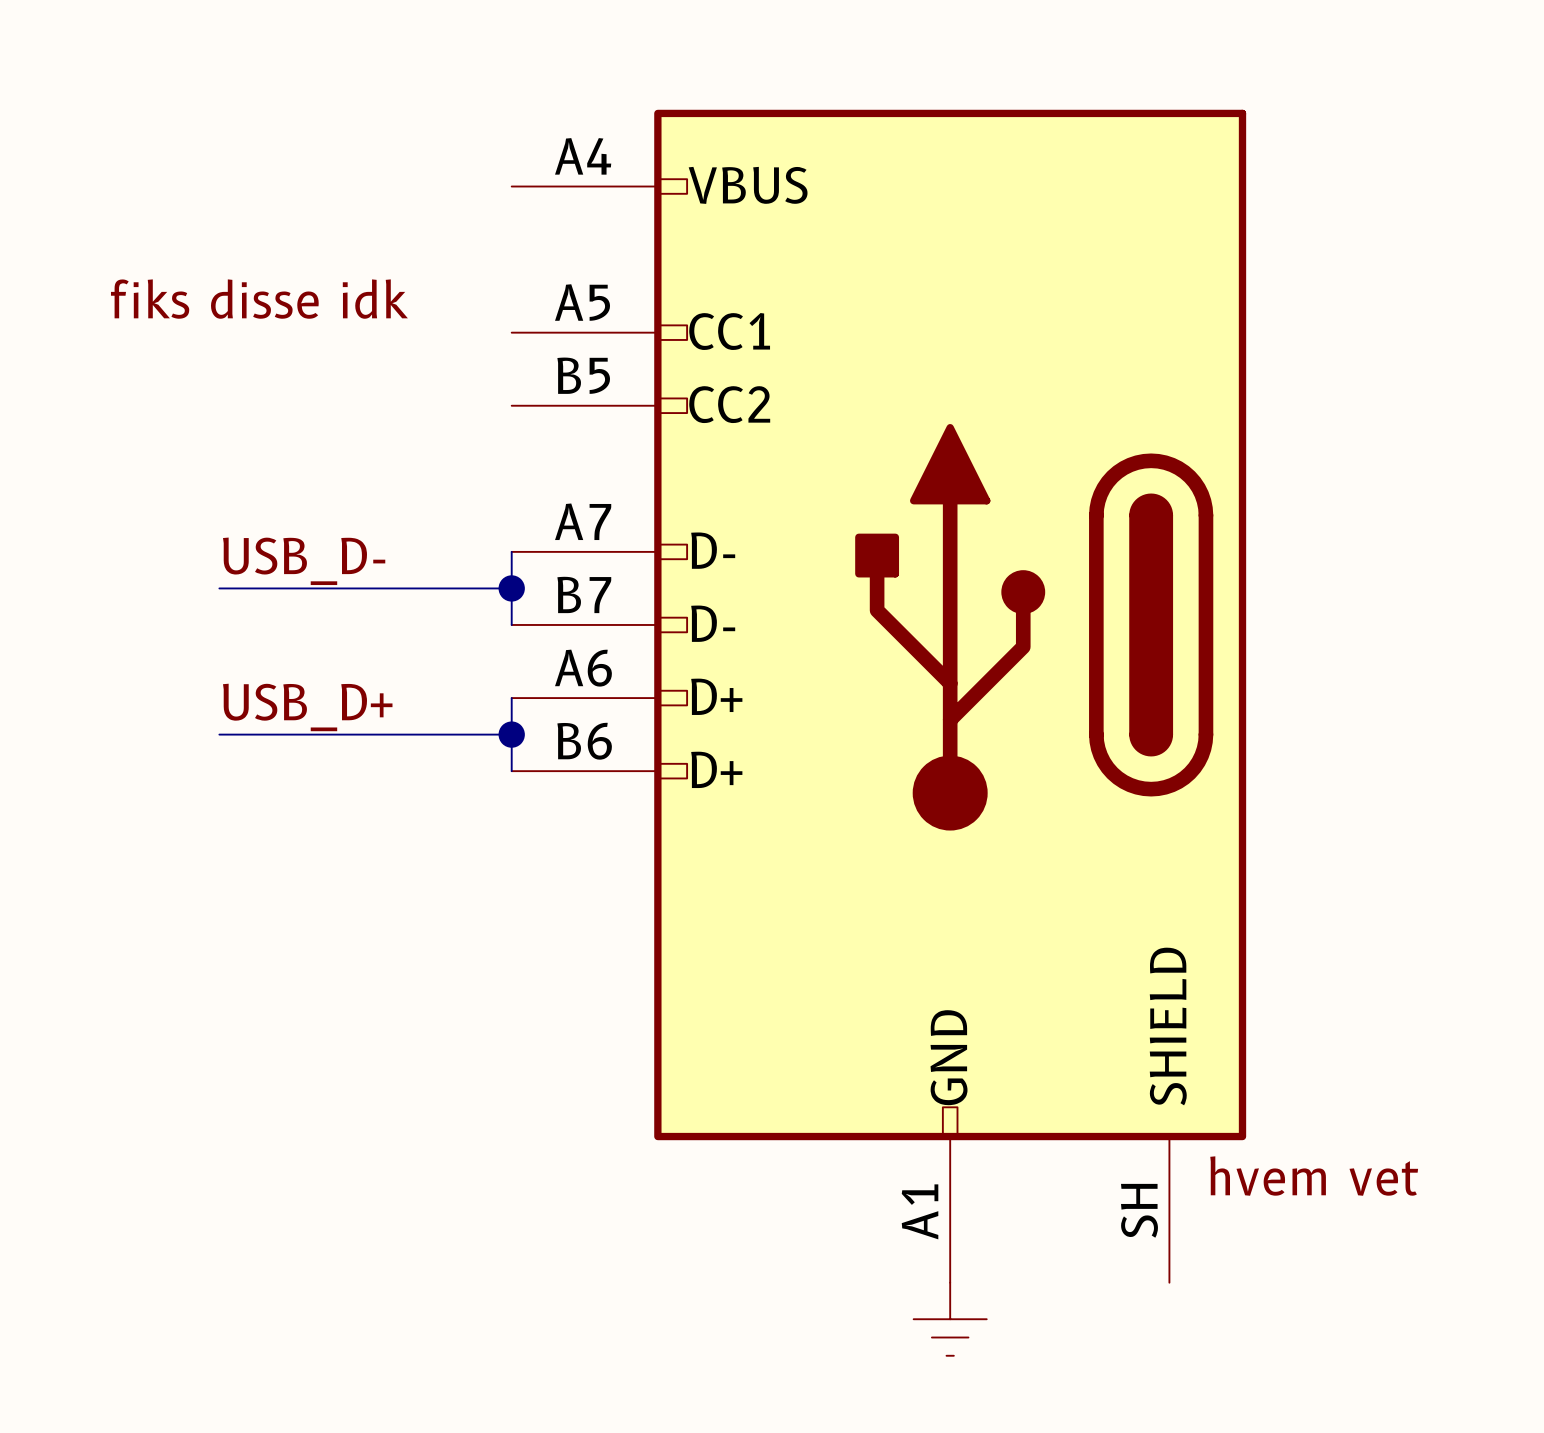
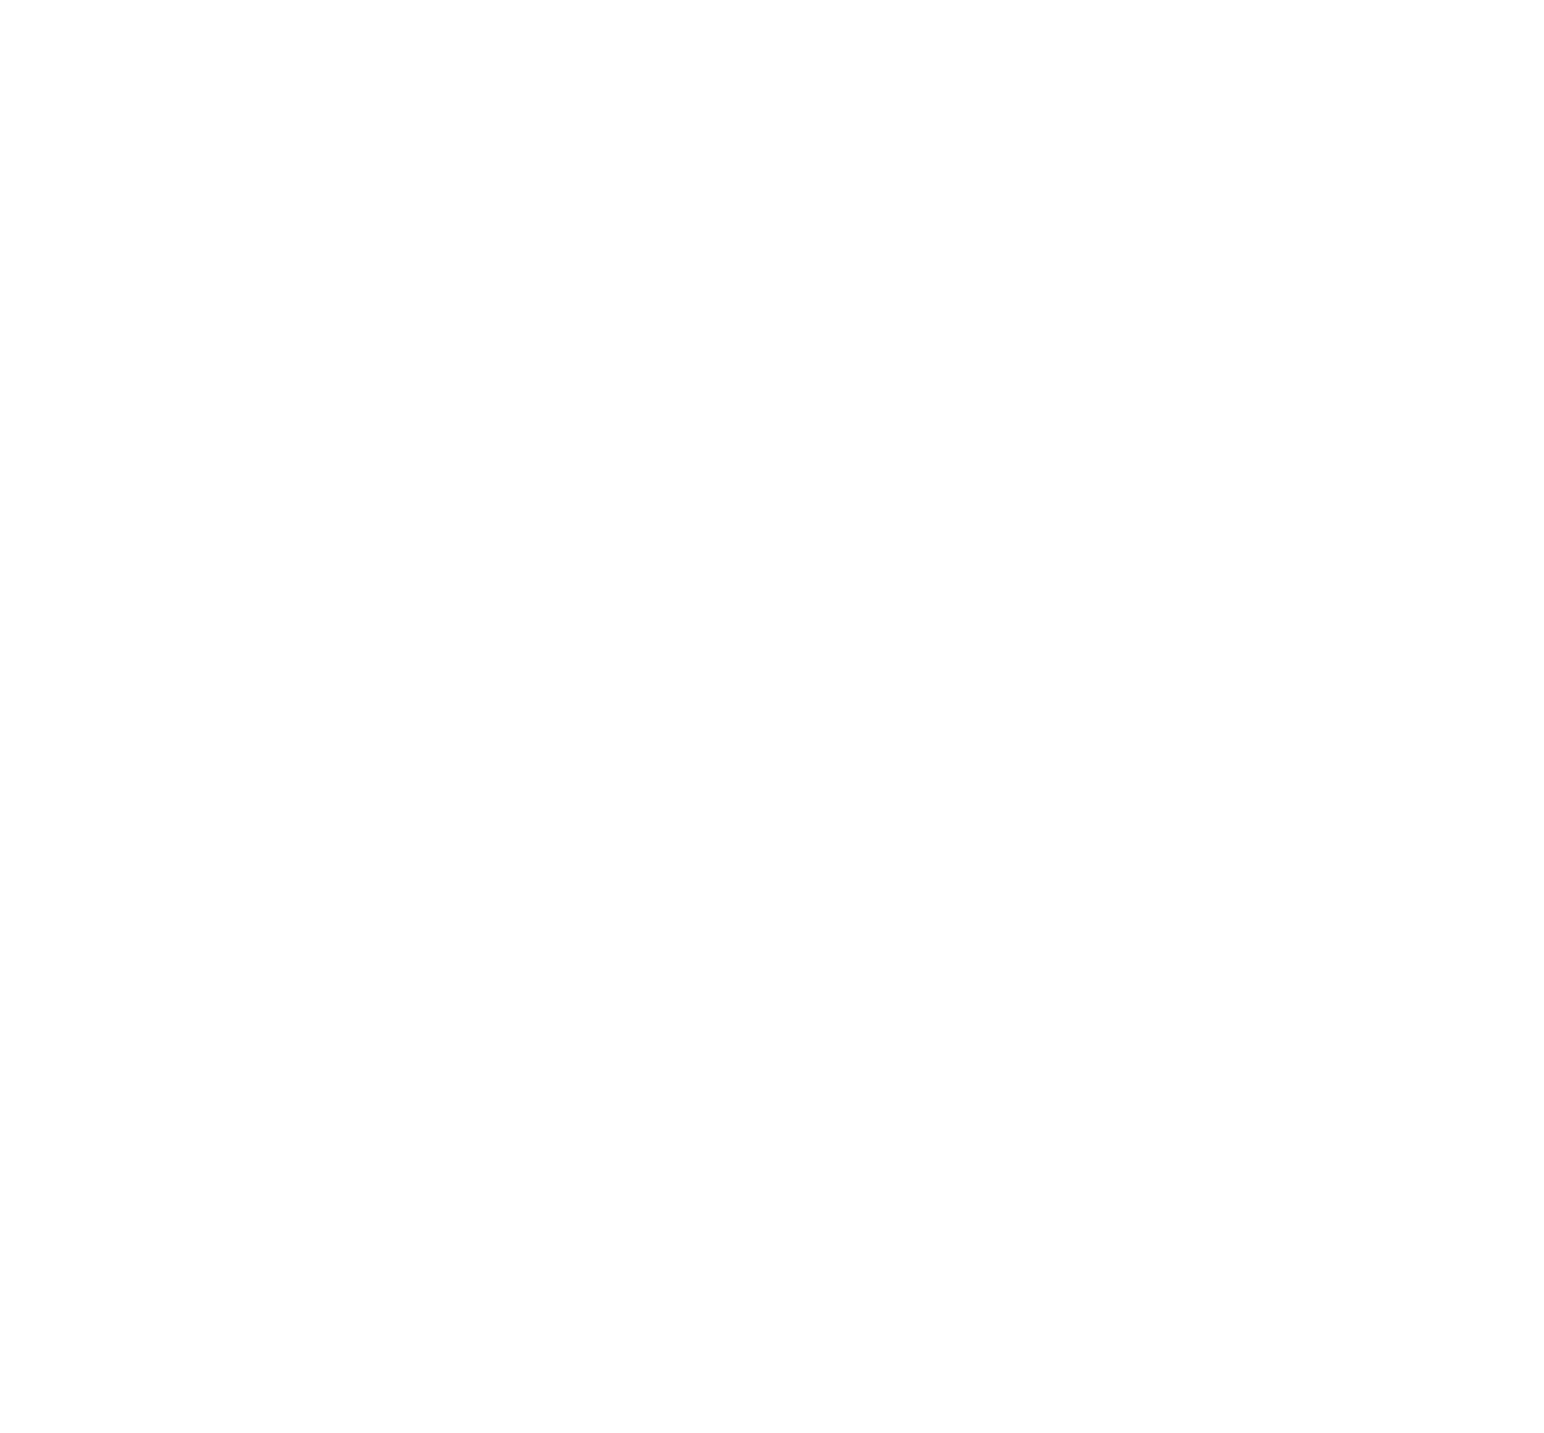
label: fiks disse idk (259, 299) -> none
wire: (511, 551) (511, 624) -> none
label: USB_D- (304, 561) -> none
wire: (219, 588) (511, 588) -> none
junction: (511, 588) -> none
part: (878, 696) -> none
wire: (511, 698) (511, 771) -> none
label: USB_D+ (307, 707) -> none
wire: (219, 734) (511, 734) -> none
junction: (511, 734) -> none
label: hvem vet (1314, 1176) -> none
power symbol: (950, 1319) -> none

